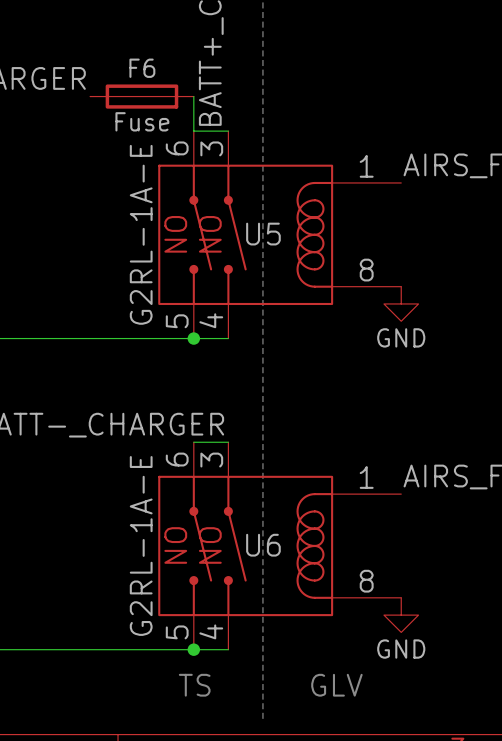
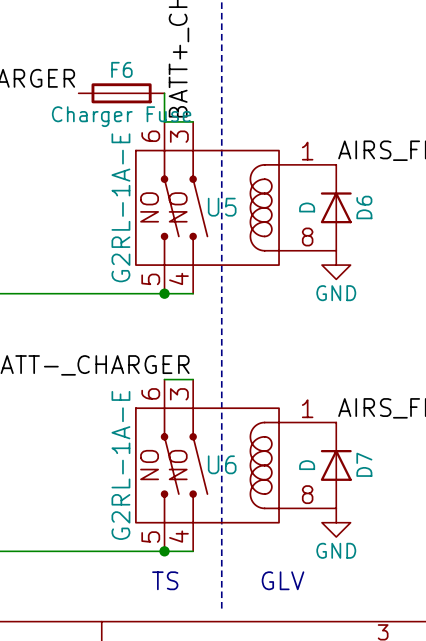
F6 value: Fuse (142, 121) -> Charger Fuse (121, 116)
D6: none -> D (336, 207)
D7: none -> D (336, 465)

